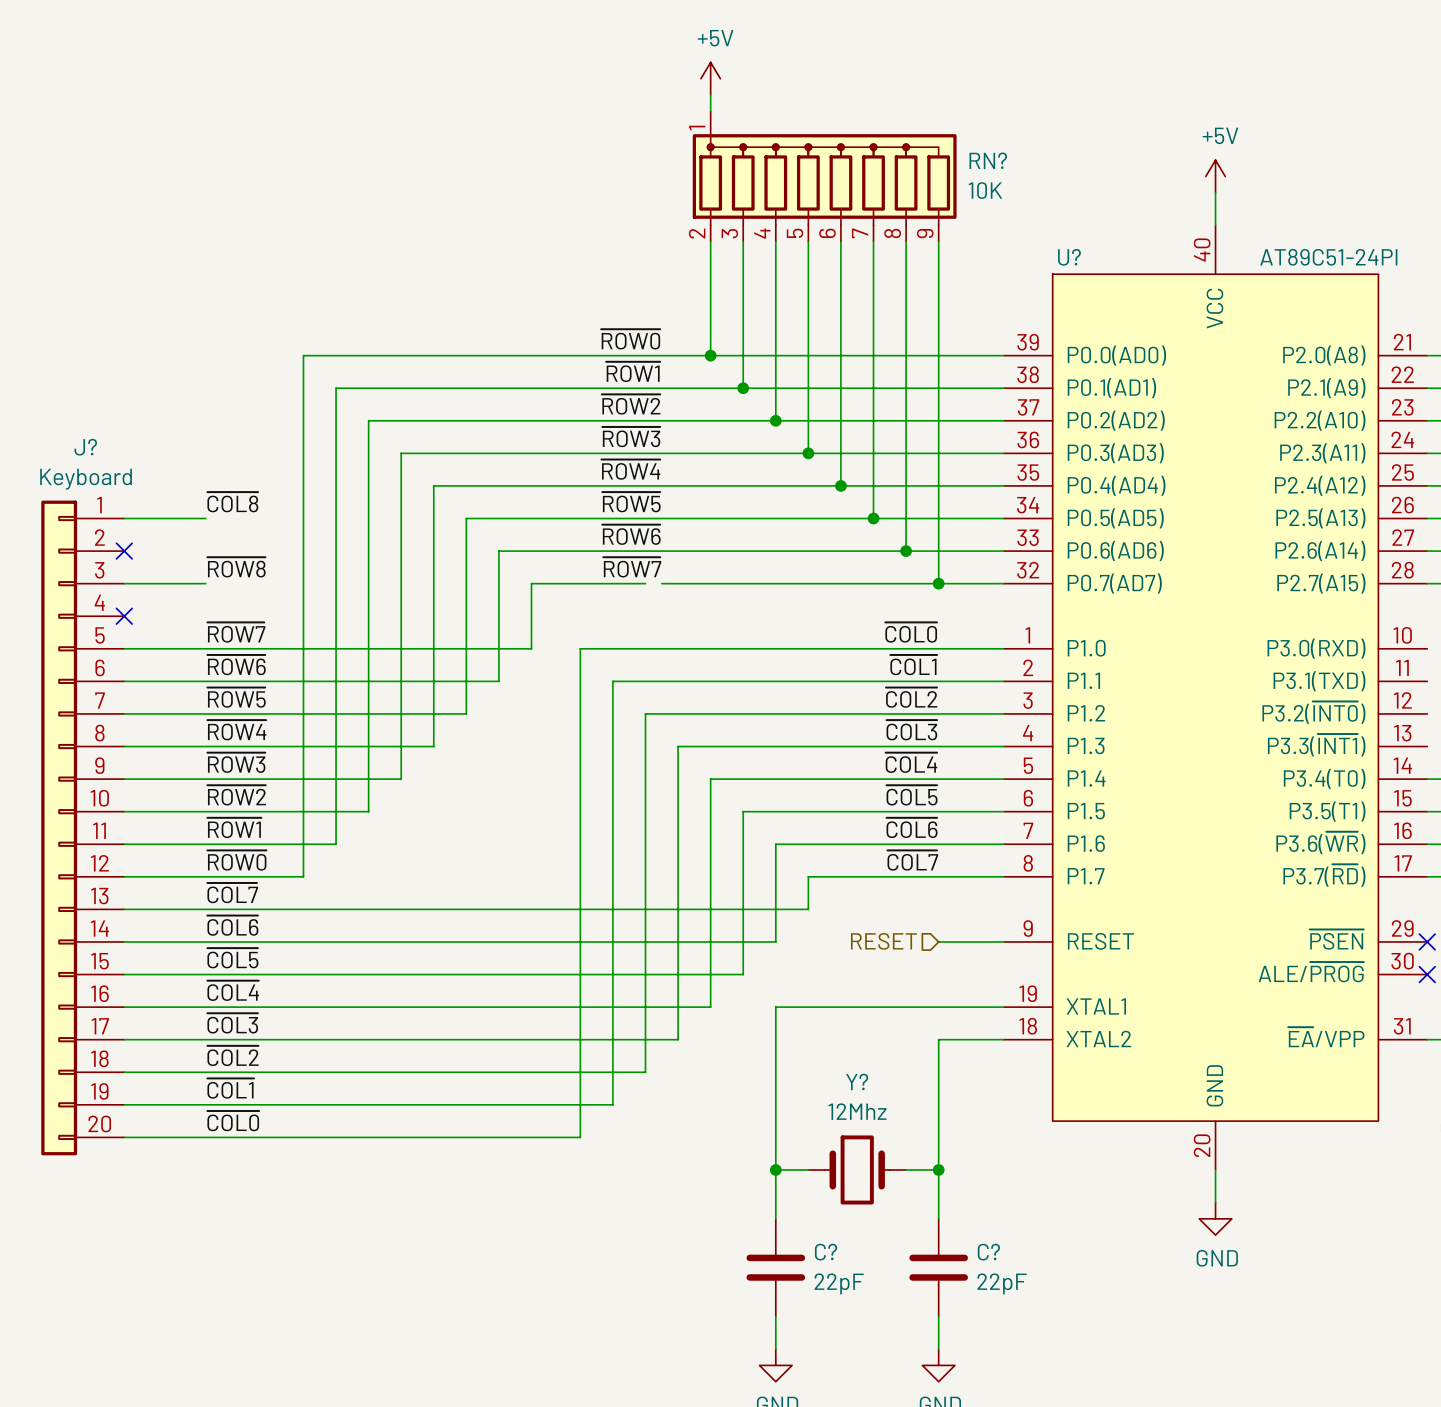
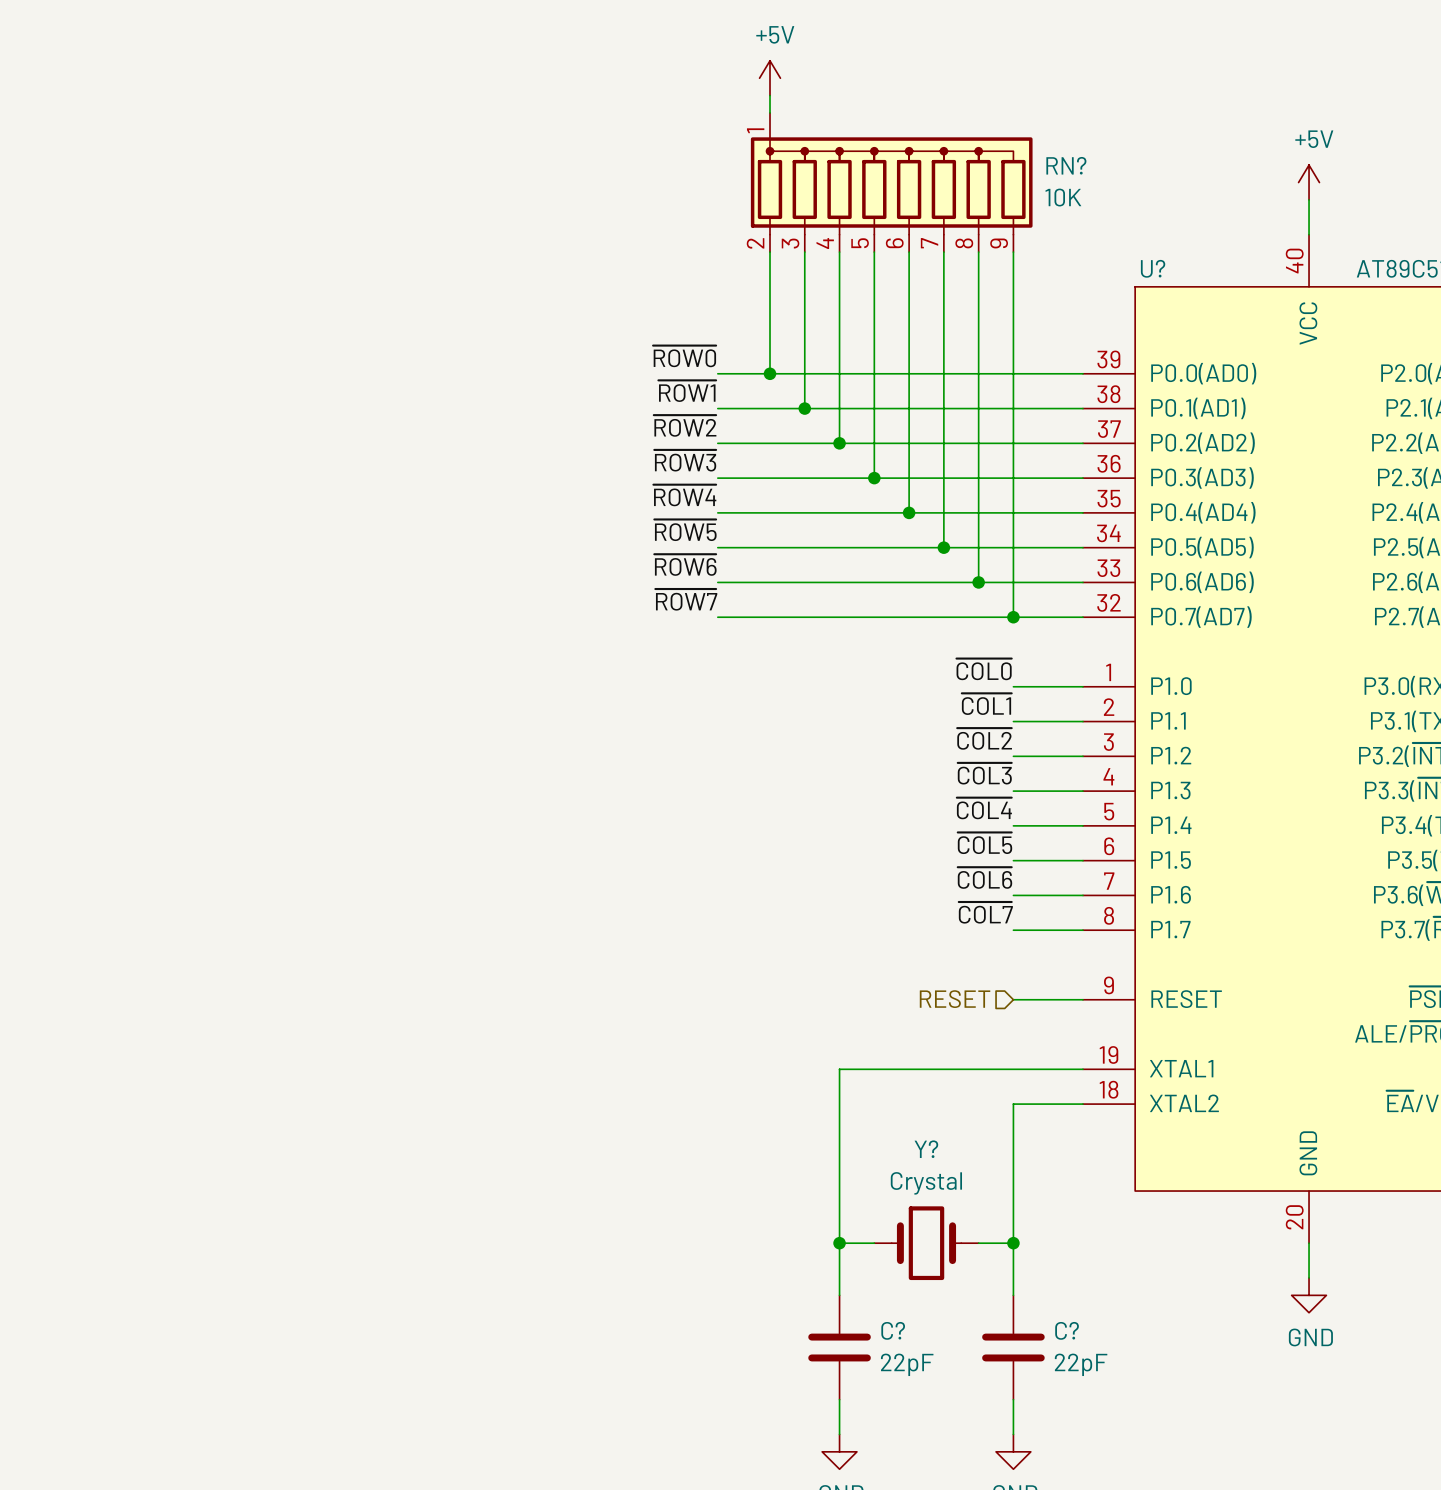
wire: (661, 355) (303, 355) (303, 876) (124, 876) -> none
wire: (661, 388) (336, 388) (336, 844) (124, 844) -> none
wire: (661, 420) (368, 420) (368, 811) (124, 811) -> none
wire: (661, 453) (401, 453) (401, 779) (124, 779) -> none
wire: (661, 485) (433, 485) (433, 746) (124, 746) -> none
label: ~{COL8} (232, 502) -> none
wire: (124, 518) (205, 518) -> none
wire: (661, 518) (466, 518) (466, 713) (124, 713) -> none
no-connect mark: (124, 551) -> none
wire: (661, 551) (498, 551) (498, 681) (124, 681) -> none
label: ~{ROW8} (236, 567) -> none
wire: (124, 583) (205, 583) -> none
wire: (645, 583) (531, 583) (531, 648) (124, 648) -> none
no-connect mark: (124, 616) -> none
label: ~{ROW7} (236, 632) -> none
wire: (938, 648) (580, 648) (580, 1137) (124, 1137) -> none
label: ~{ROW6} (236, 665) -> none
wire: (938, 681) (612, 681) (612, 1104) (124, 1104) -> none
label: ~{ROW5} (236, 697) -> none
wire: (938, 713) (645, 713) (645, 1072) (124, 1072) -> none
label: ~{ROW4} (236, 730) -> none
wire: (938, 746) (678, 746) (678, 1039) (124, 1039) -> none
label: ~{ROW3} (236, 762) -> none
wire: (938, 779) (710, 779) (710, 1007) (124, 1007) -> none
label: ~{ROW2} (236, 795) -> none
wire: (938, 811) (743, 811) (743, 974) (124, 974) -> none
J?: Keyboard (82, 827) -> none
label: ~{ROW1} (234, 827) -> none
wire: (938, 844) (775, 844) (775, 941) (124, 941) -> none
label: ~{ROW0} (236, 860) -> none
wire: (938, 876) (808, 876) (808, 909) (124, 909) -> none
label: ~{COL7} (232, 893) -> none
label: ~{COL6} (232, 925) -> none
label: ~{COL5} (232, 958) -> none
label: ~{COL4} (233, 990) -> none
label: ~{COL3} (232, 1023) -> none
label: ~{COL2} (233, 1055) -> none
label: ~{COL1} (230, 1088) -> none
Y? value: 12Mhz (857, 1111) -> Crystal (926, 1183)
label: ~{COL0} (233, 1121) -> none

